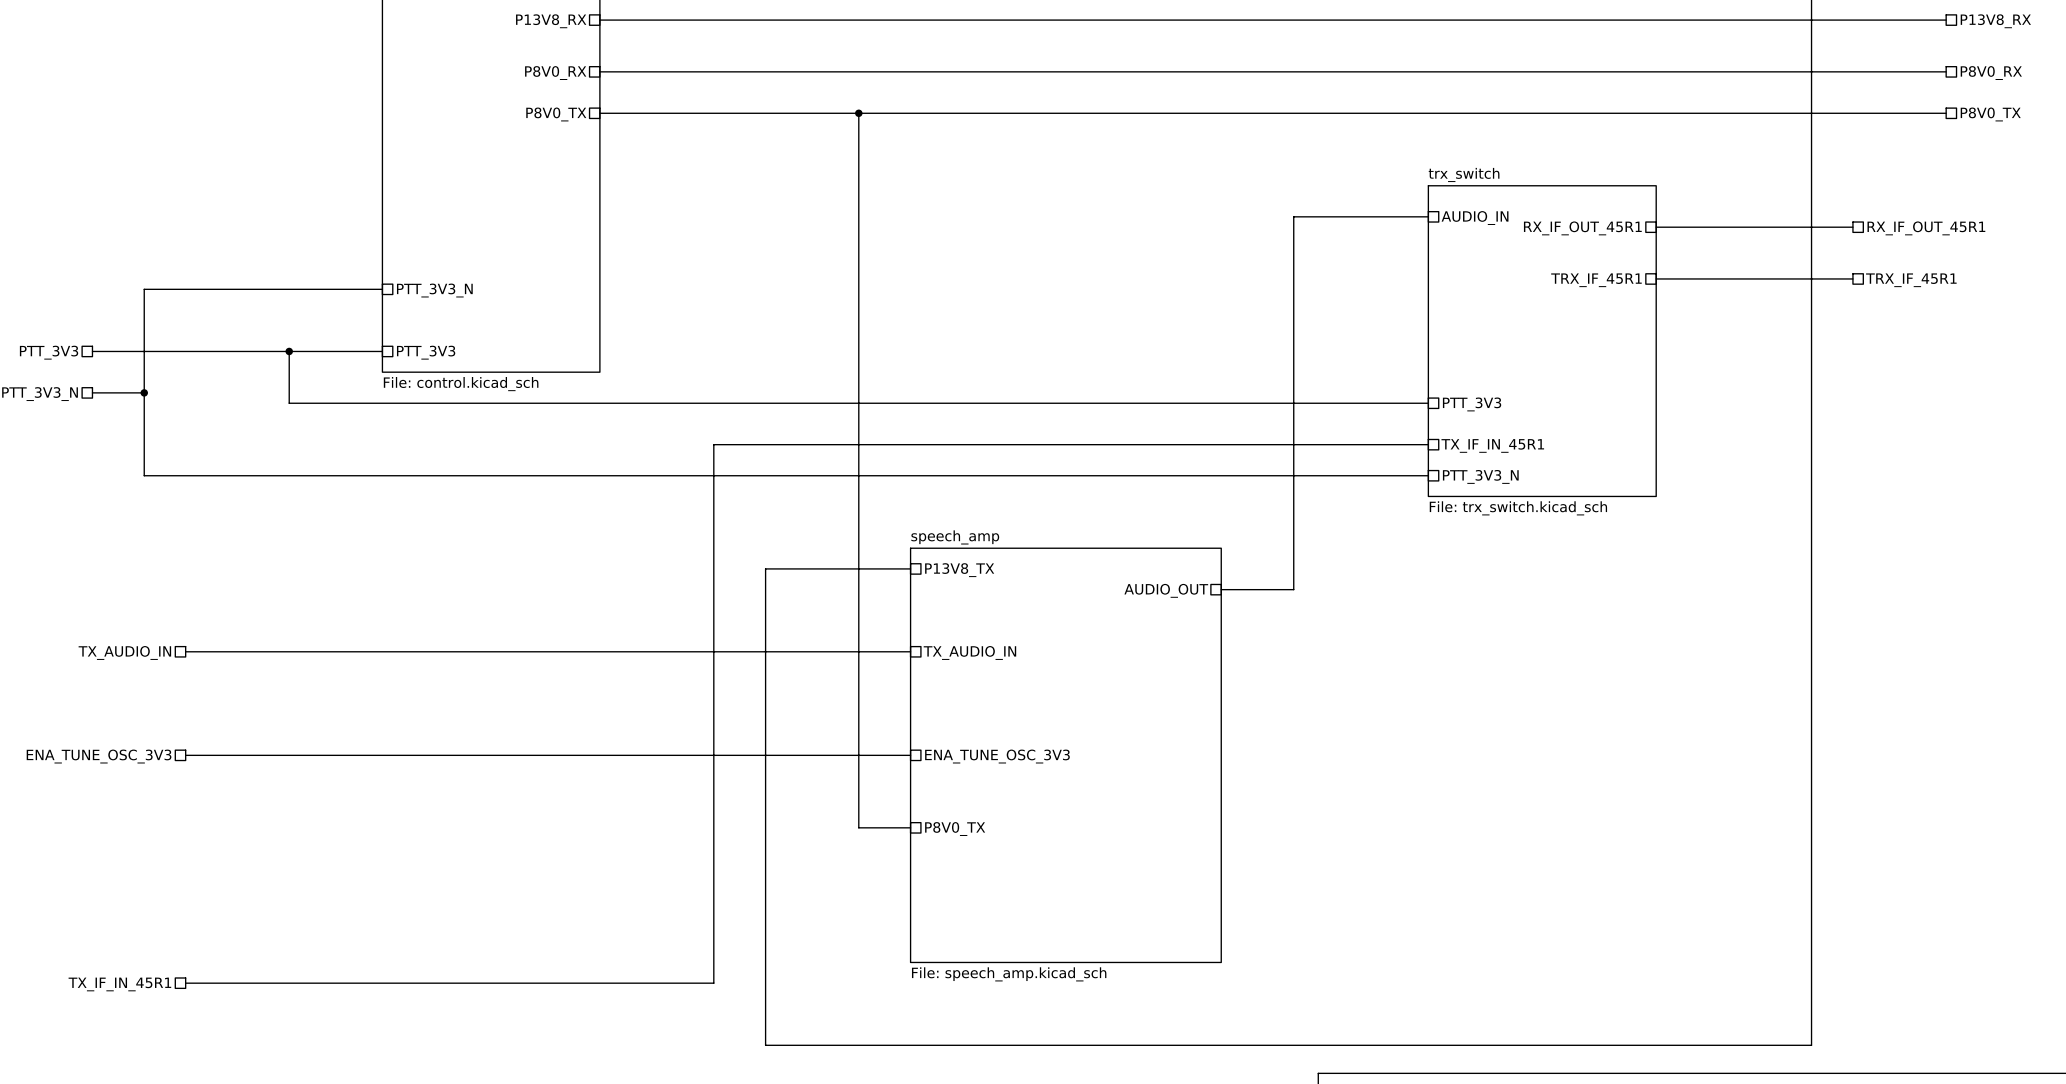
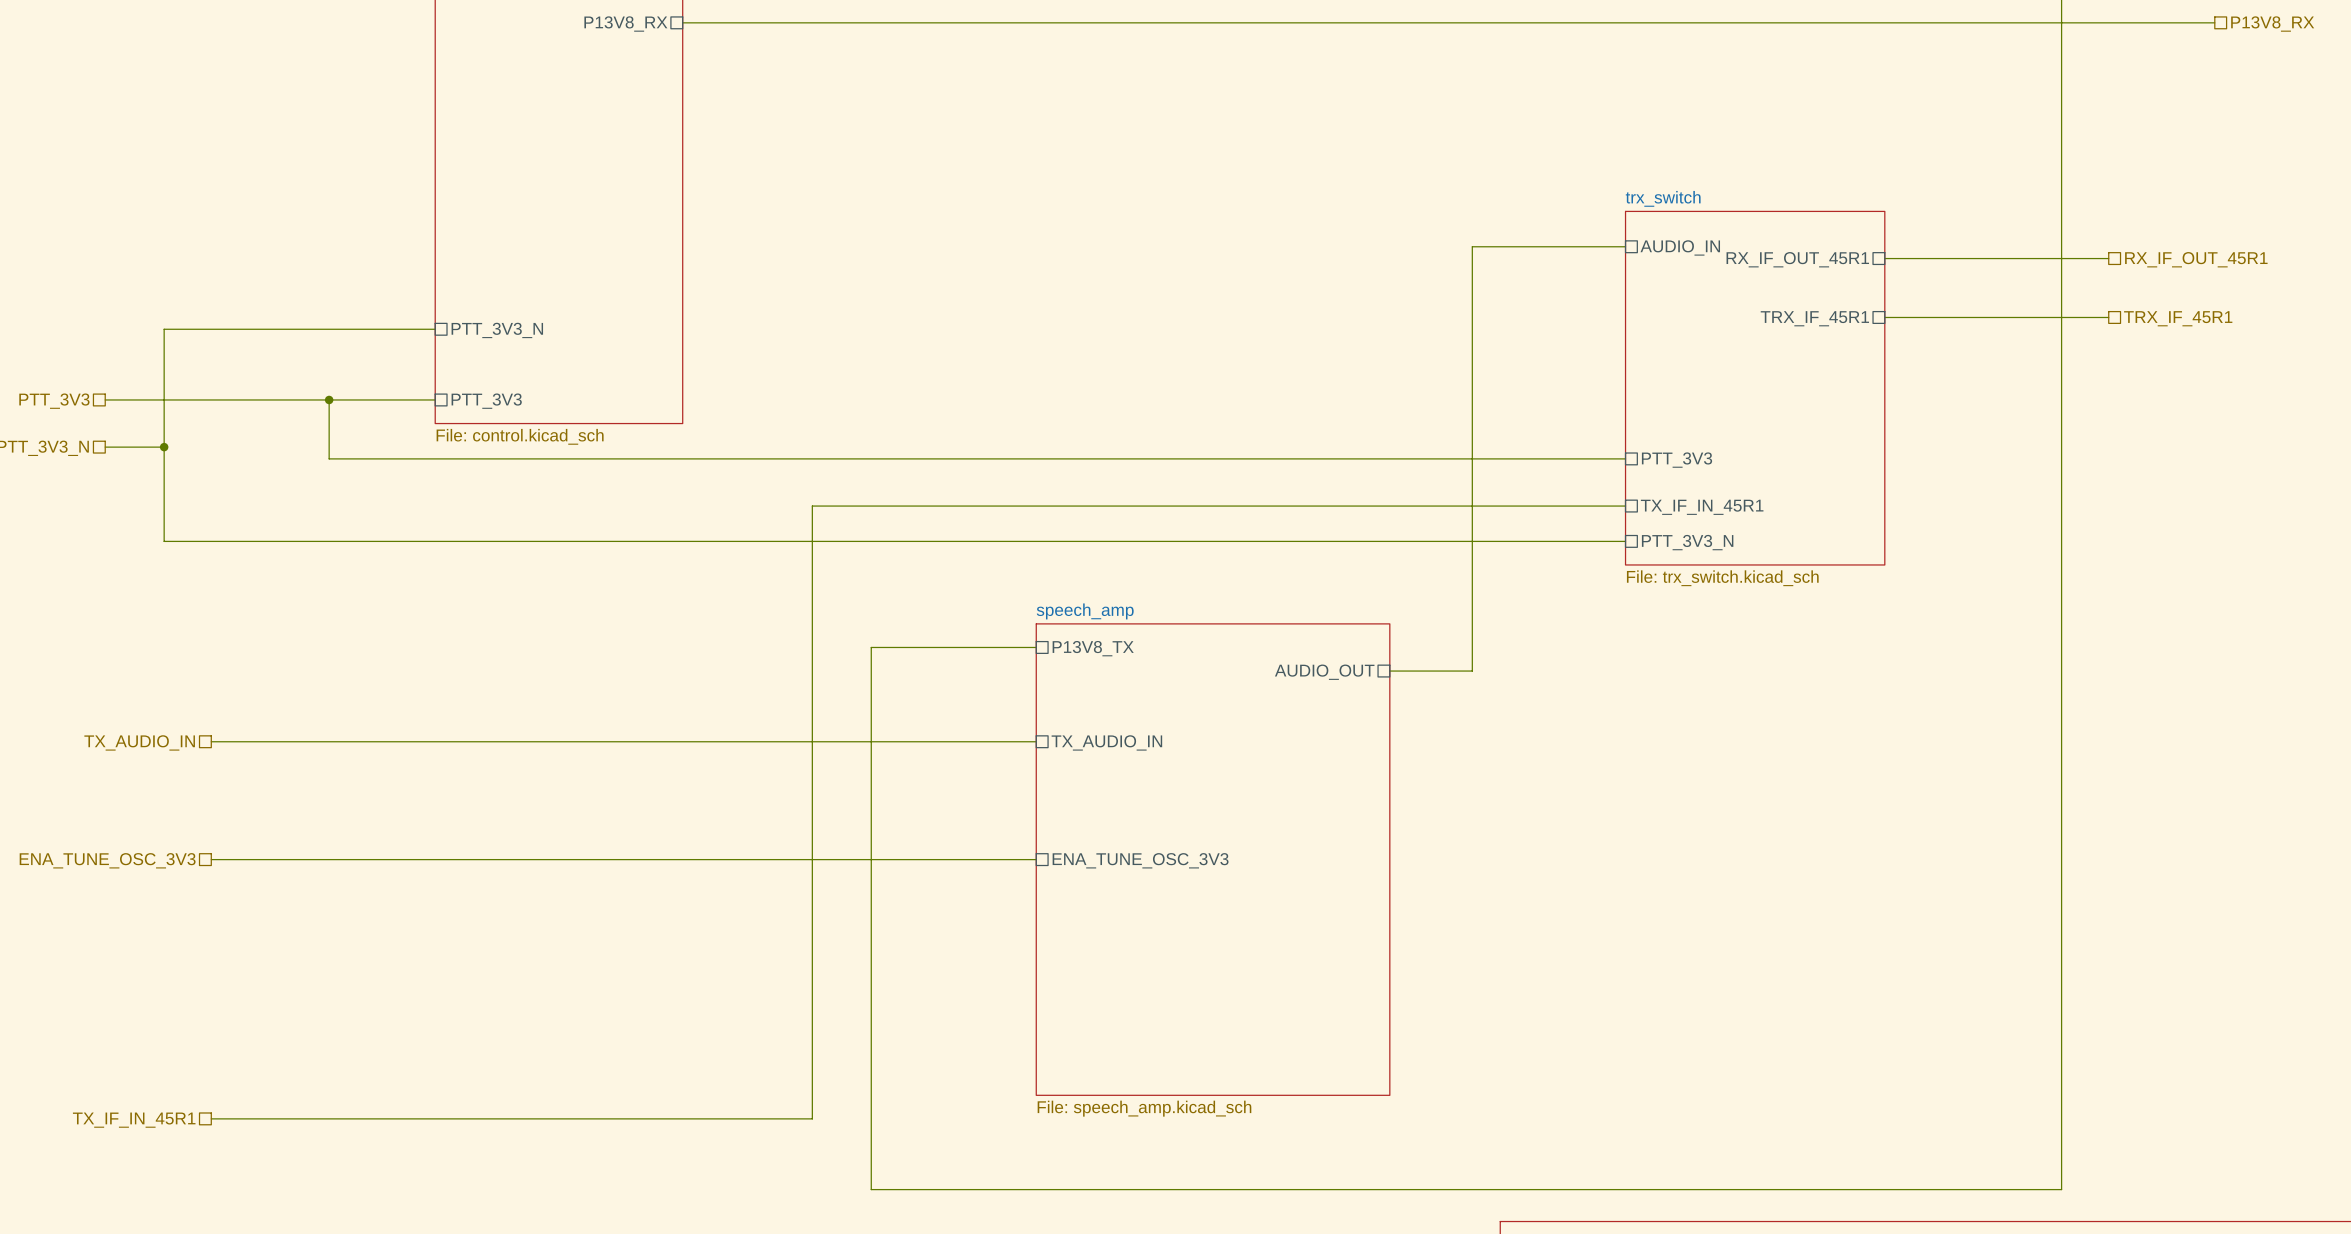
wire: (599, 71) (1946, 71) -> none
sheet pin: P8V0_RX (555, 73) -> none
hierarchical label: P8V0_RX (1991, 73) -> none
wire: (599, 113) (1946, 113) -> none
wire: (858, 113) (858, 827) (910, 827) -> none
junction: (858, 113) -> none
sheet pin: P8V0_TX (556, 114) -> none
hierarchical label: P8V0_TX (1990, 114) -> none
sheet pin: P8V0_TX (955, 829) -> none

